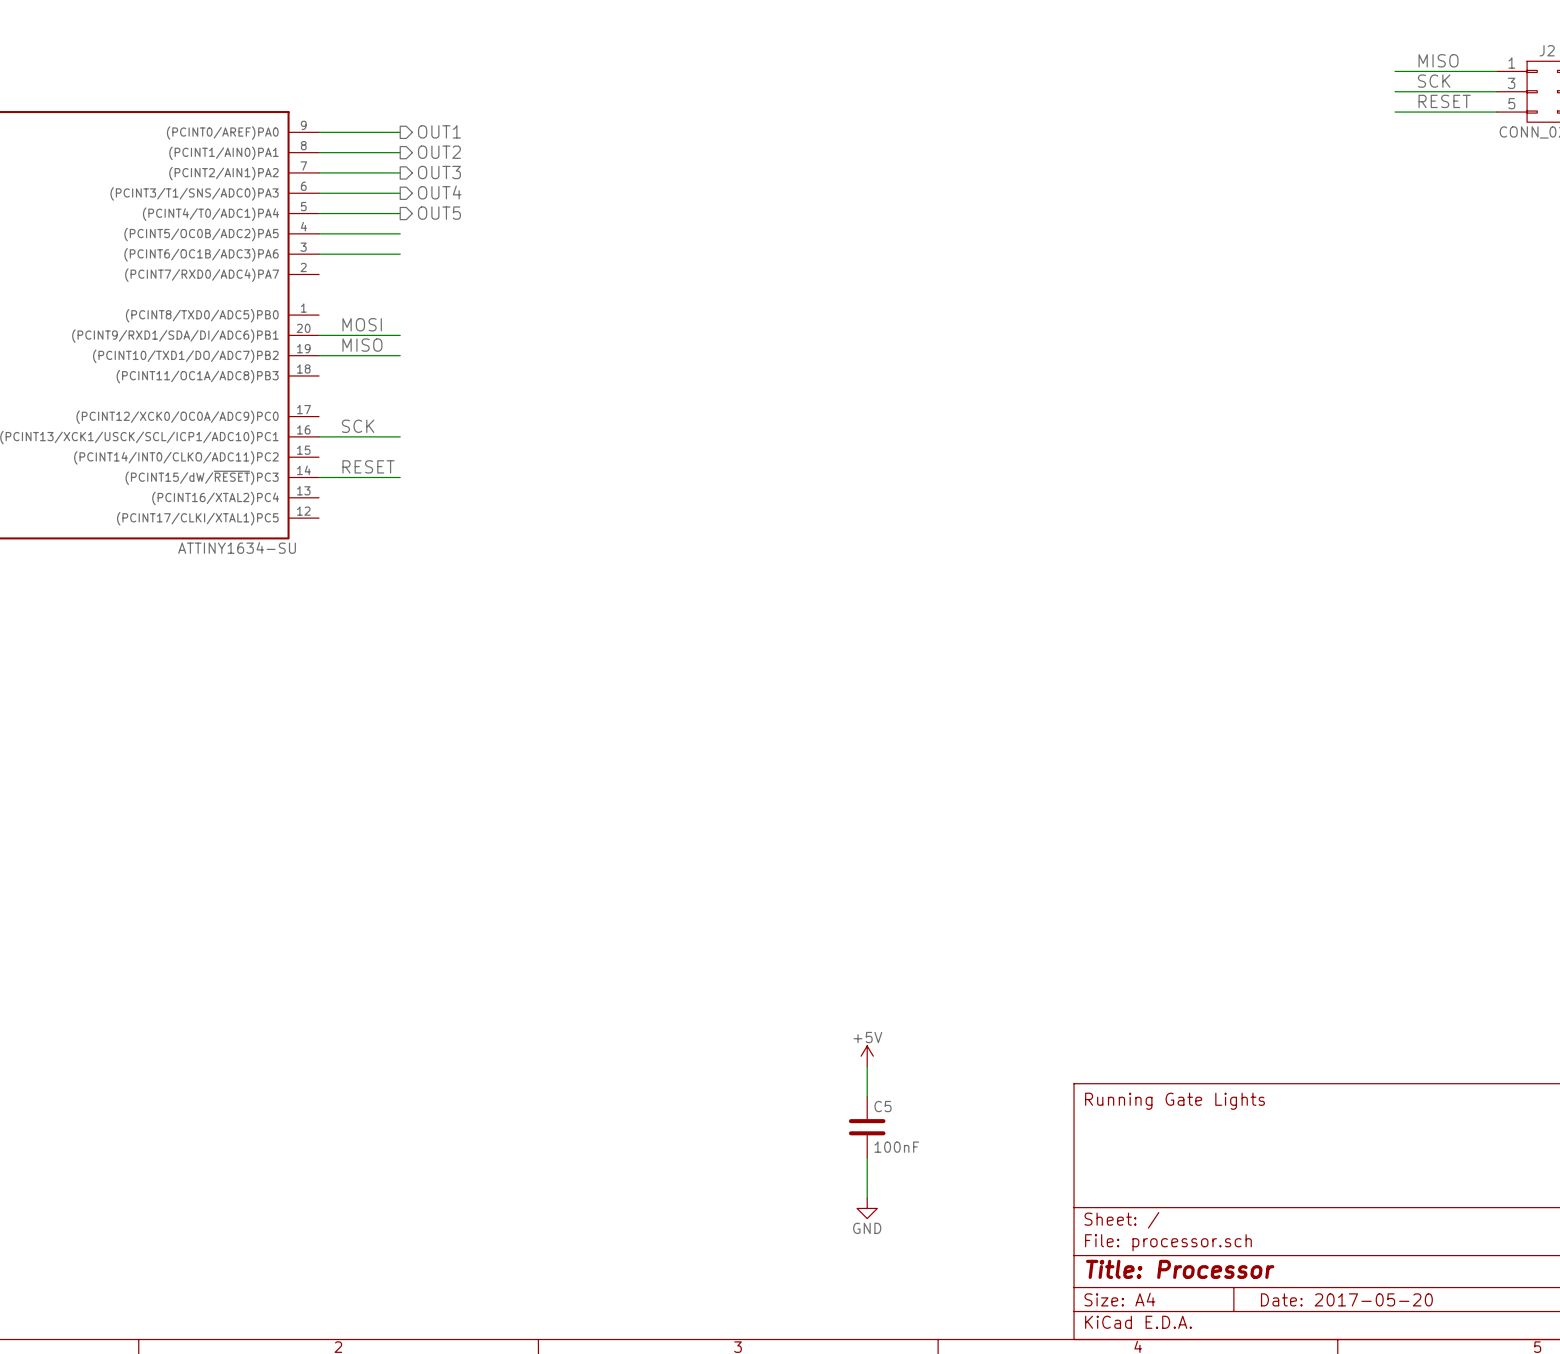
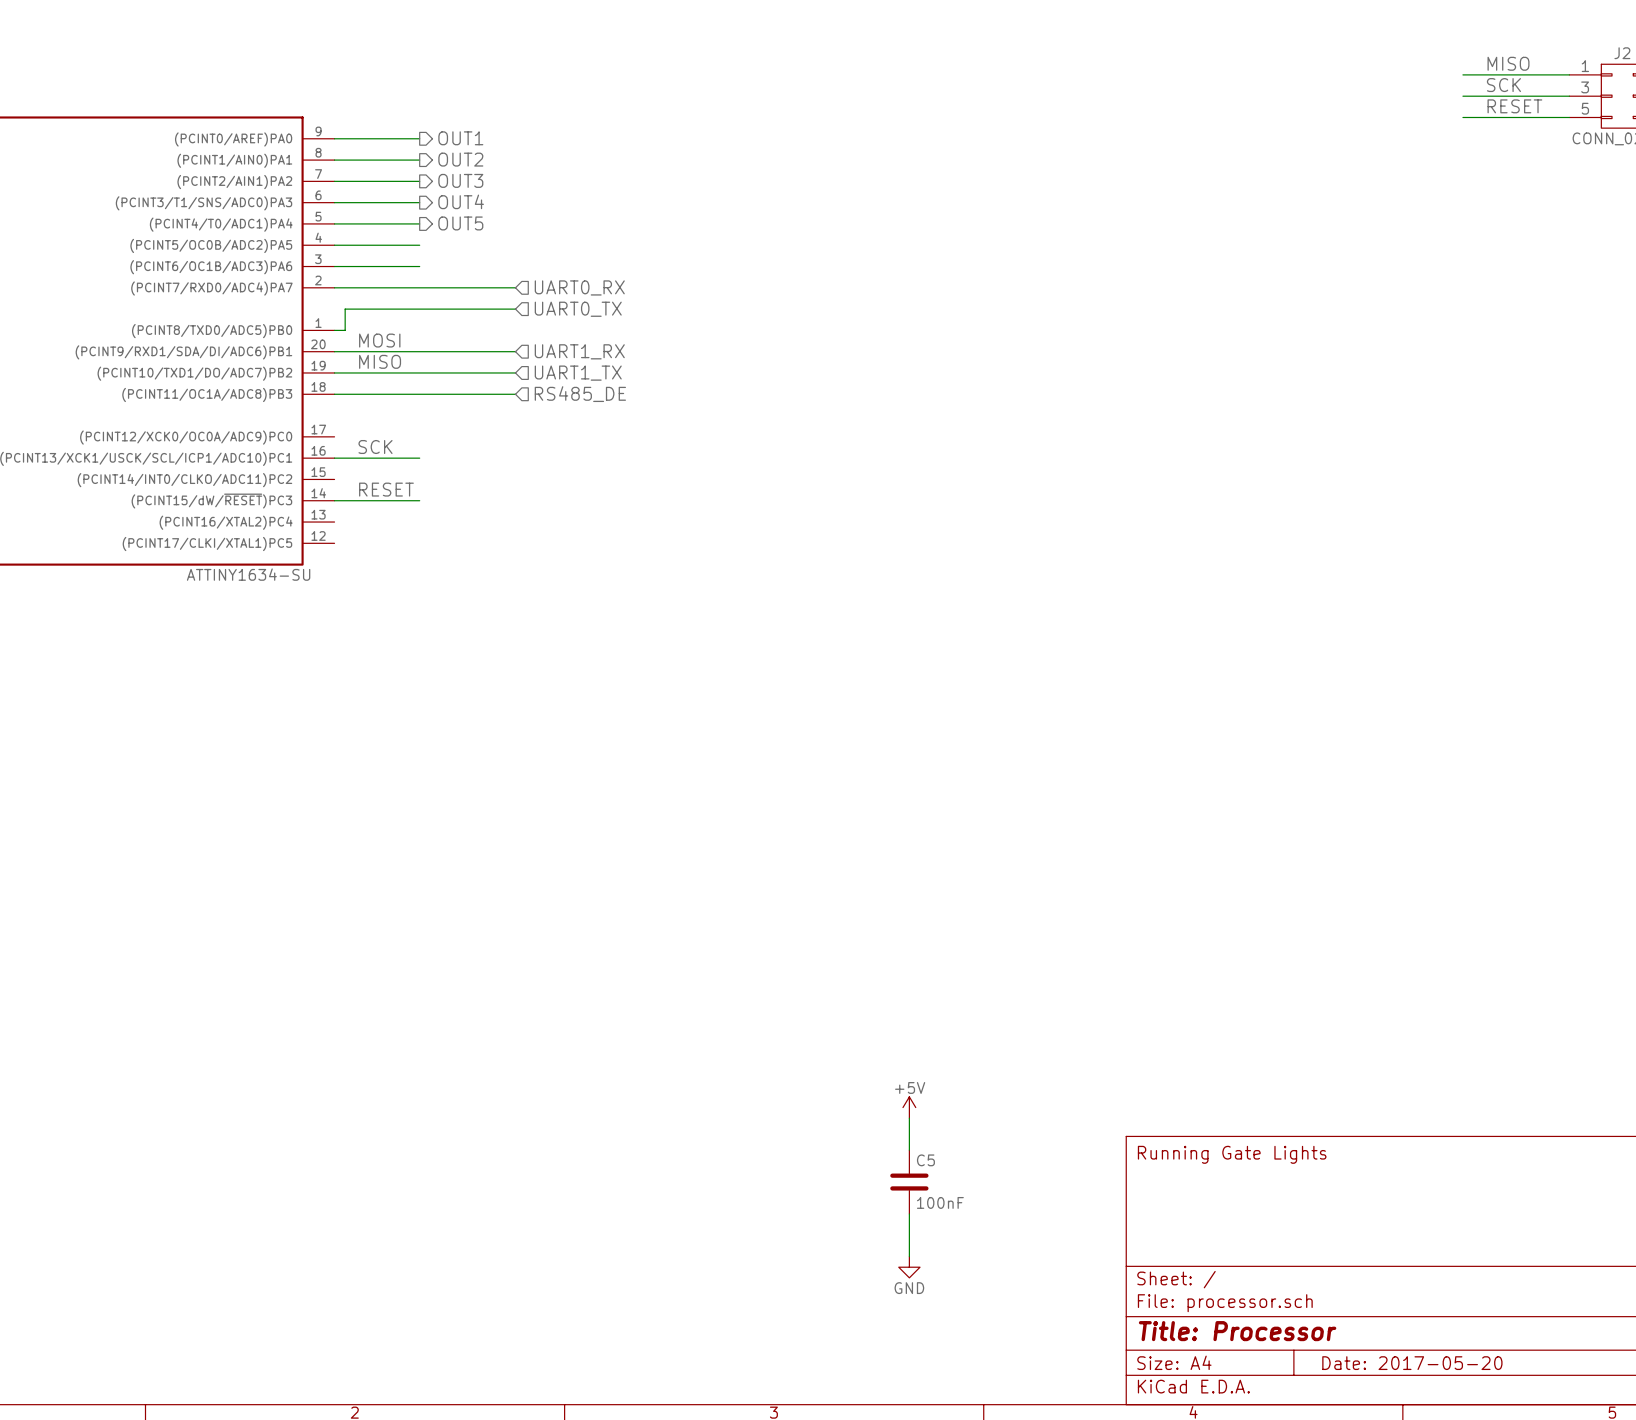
wire: none -> (334, 287) (515, 287)
hierarchical label: none -> UART0_RX (579, 287)
wire: none -> (515, 309) (345, 309) (345, 330) (334, 330)
hierarchical label: none -> UART0_TX (578, 309)
wire: none -> (419, 351) (515, 351)
hierarchical label: none -> UART1_RX (579, 351)
wire: none -> (419, 372) (515, 372)
hierarchical label: none -> UART1_TX (578, 373)
wire: none -> (334, 394) (515, 394)
hierarchical label: none -> RS485_DE (580, 394)

